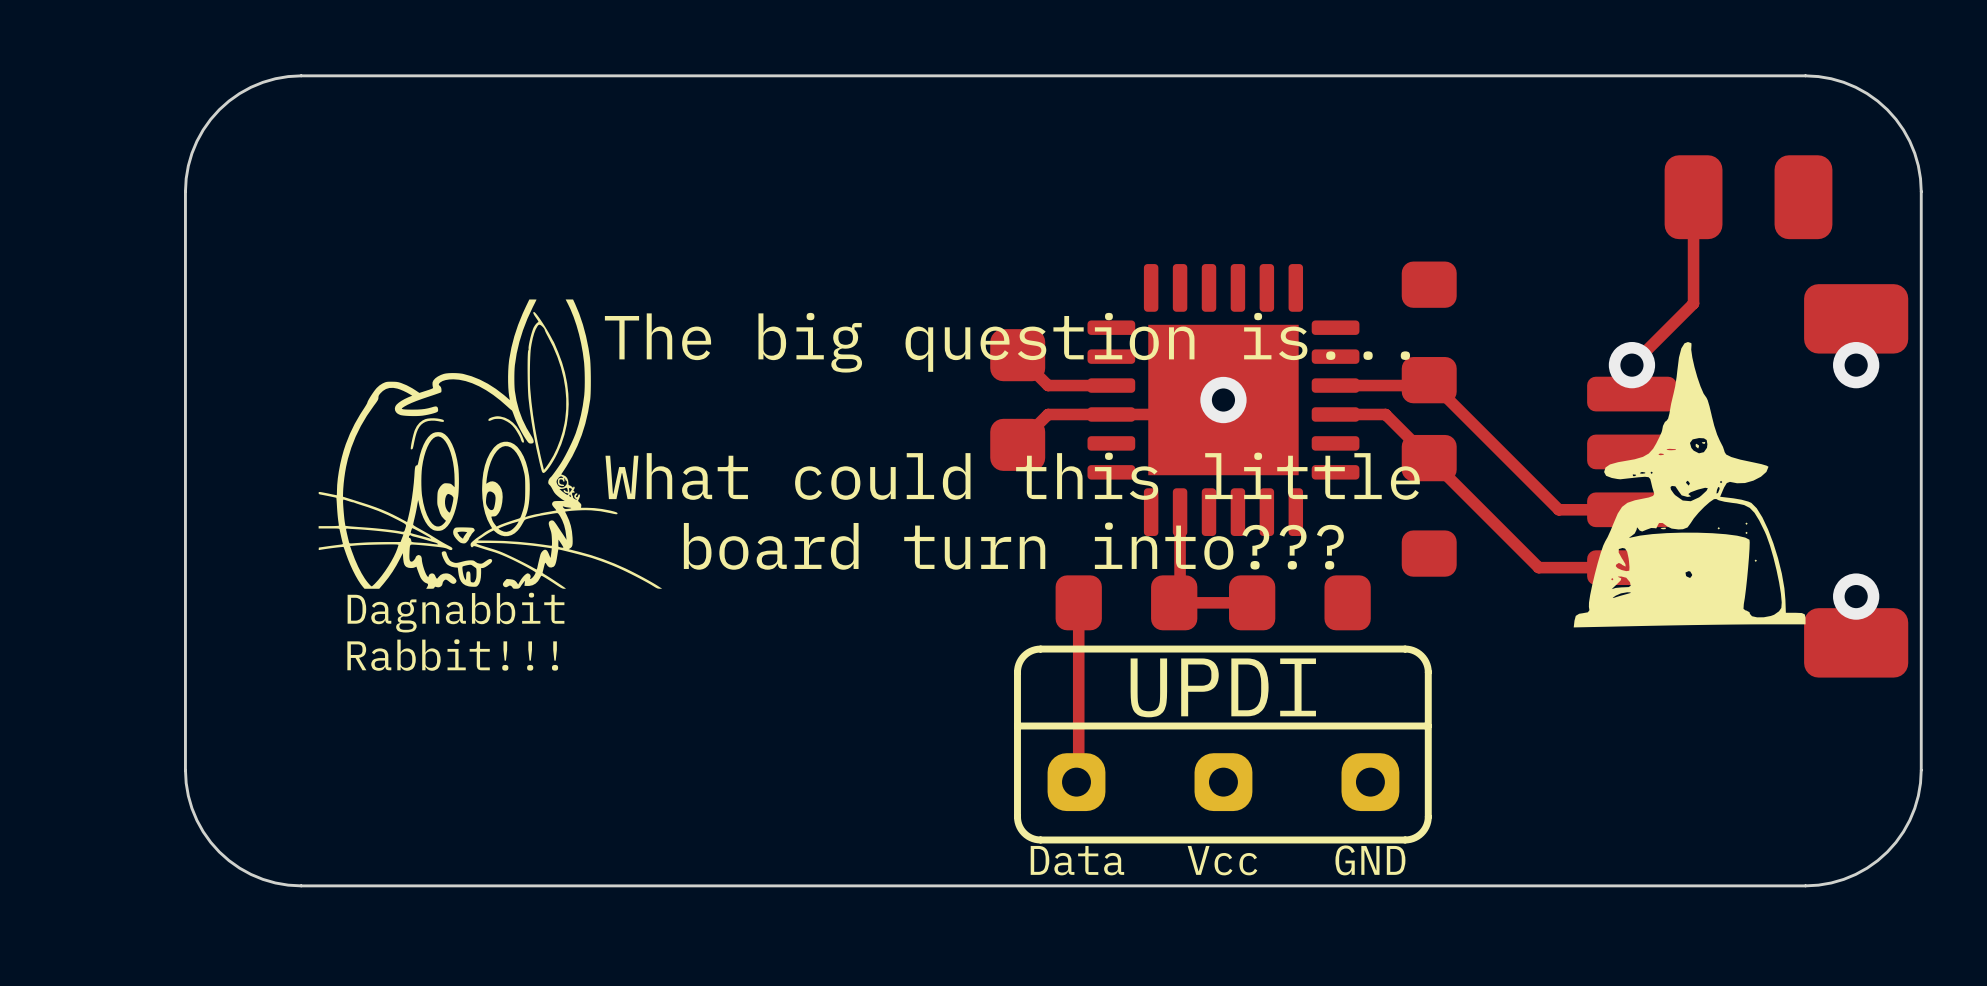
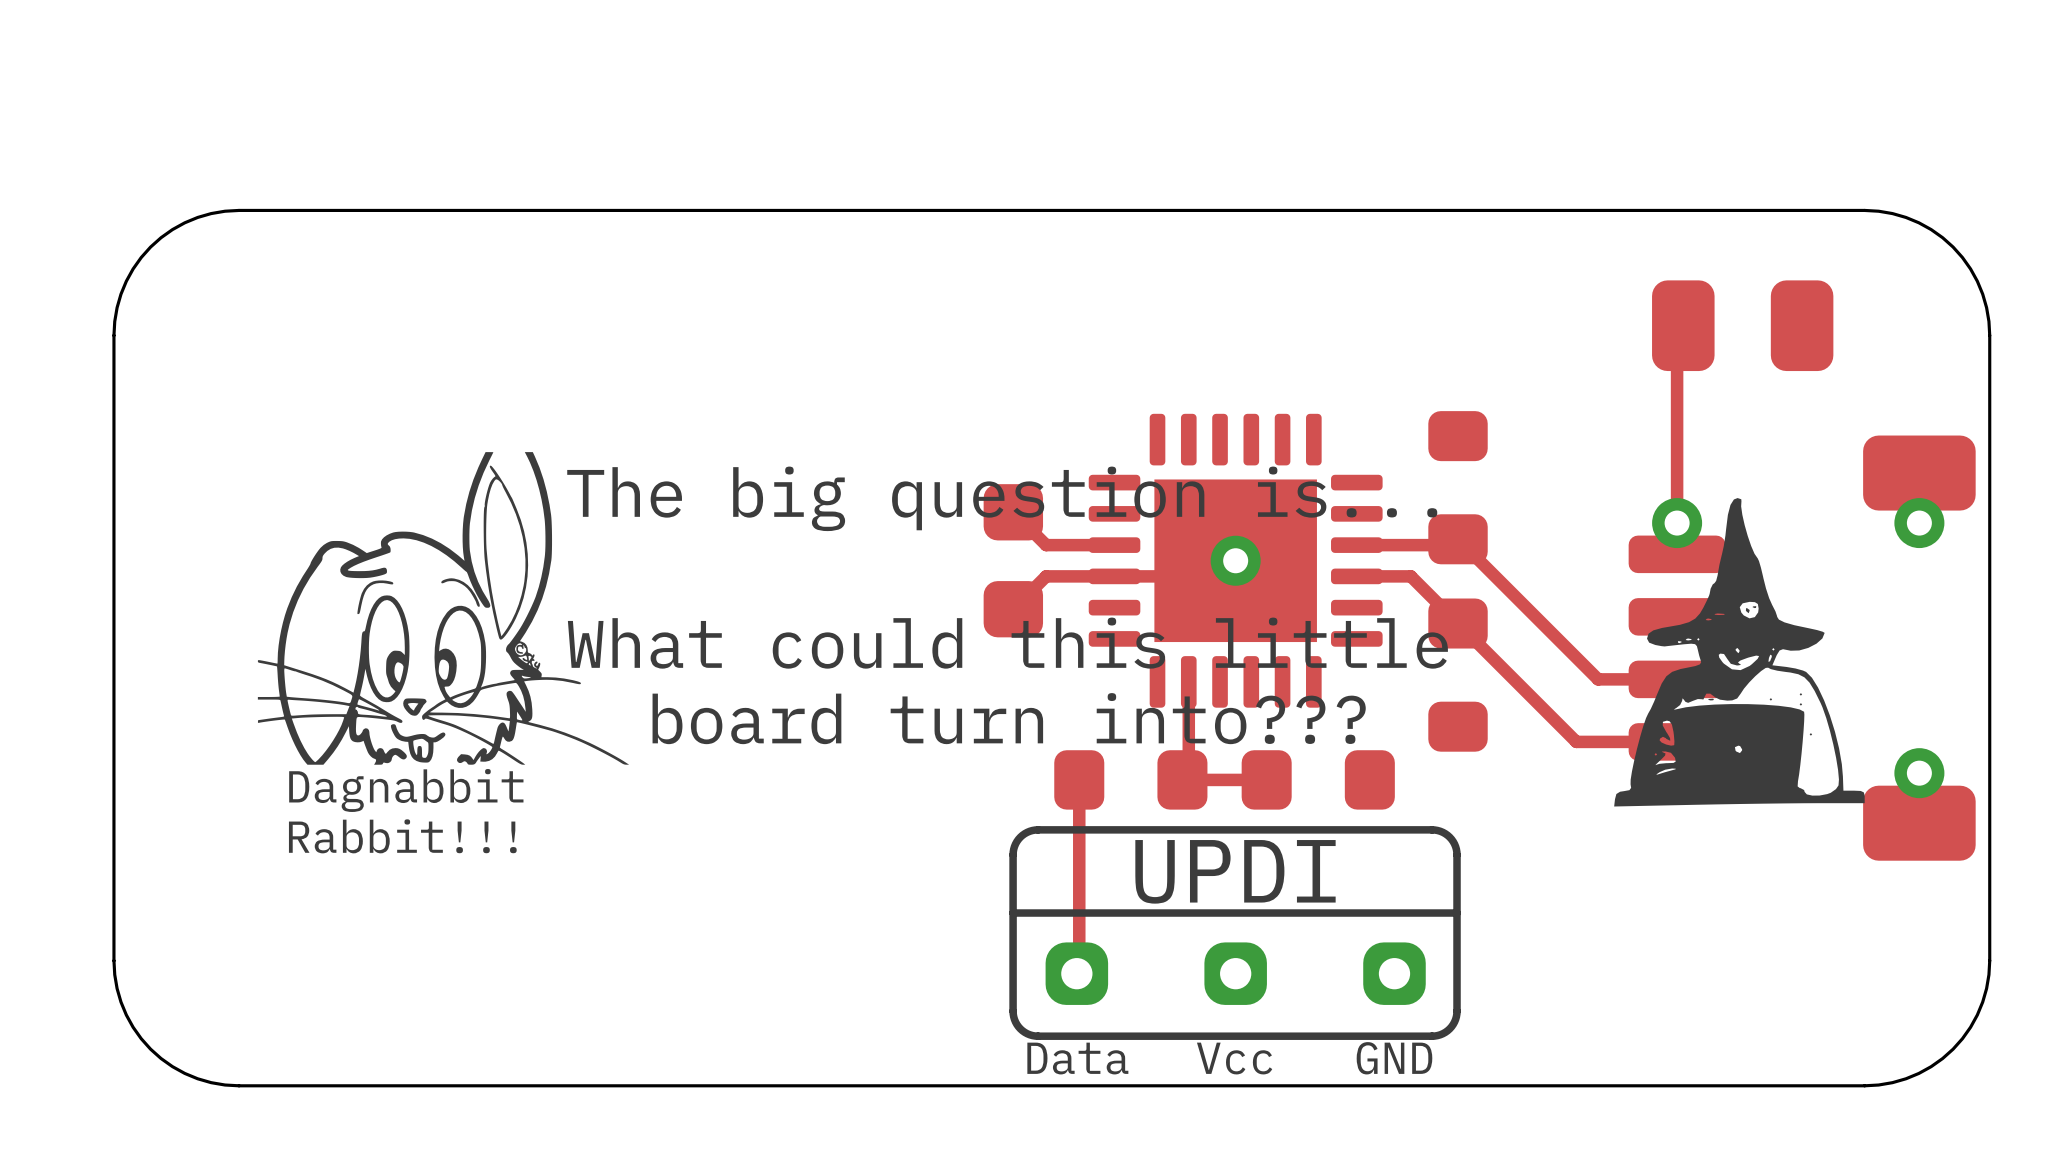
top track: (1693, 197) (1693, 303) (1631, 365) -> (1683, 325) (1677, 331) (1677, 523)
part position: (1748, 197) -> (1742, 325)

